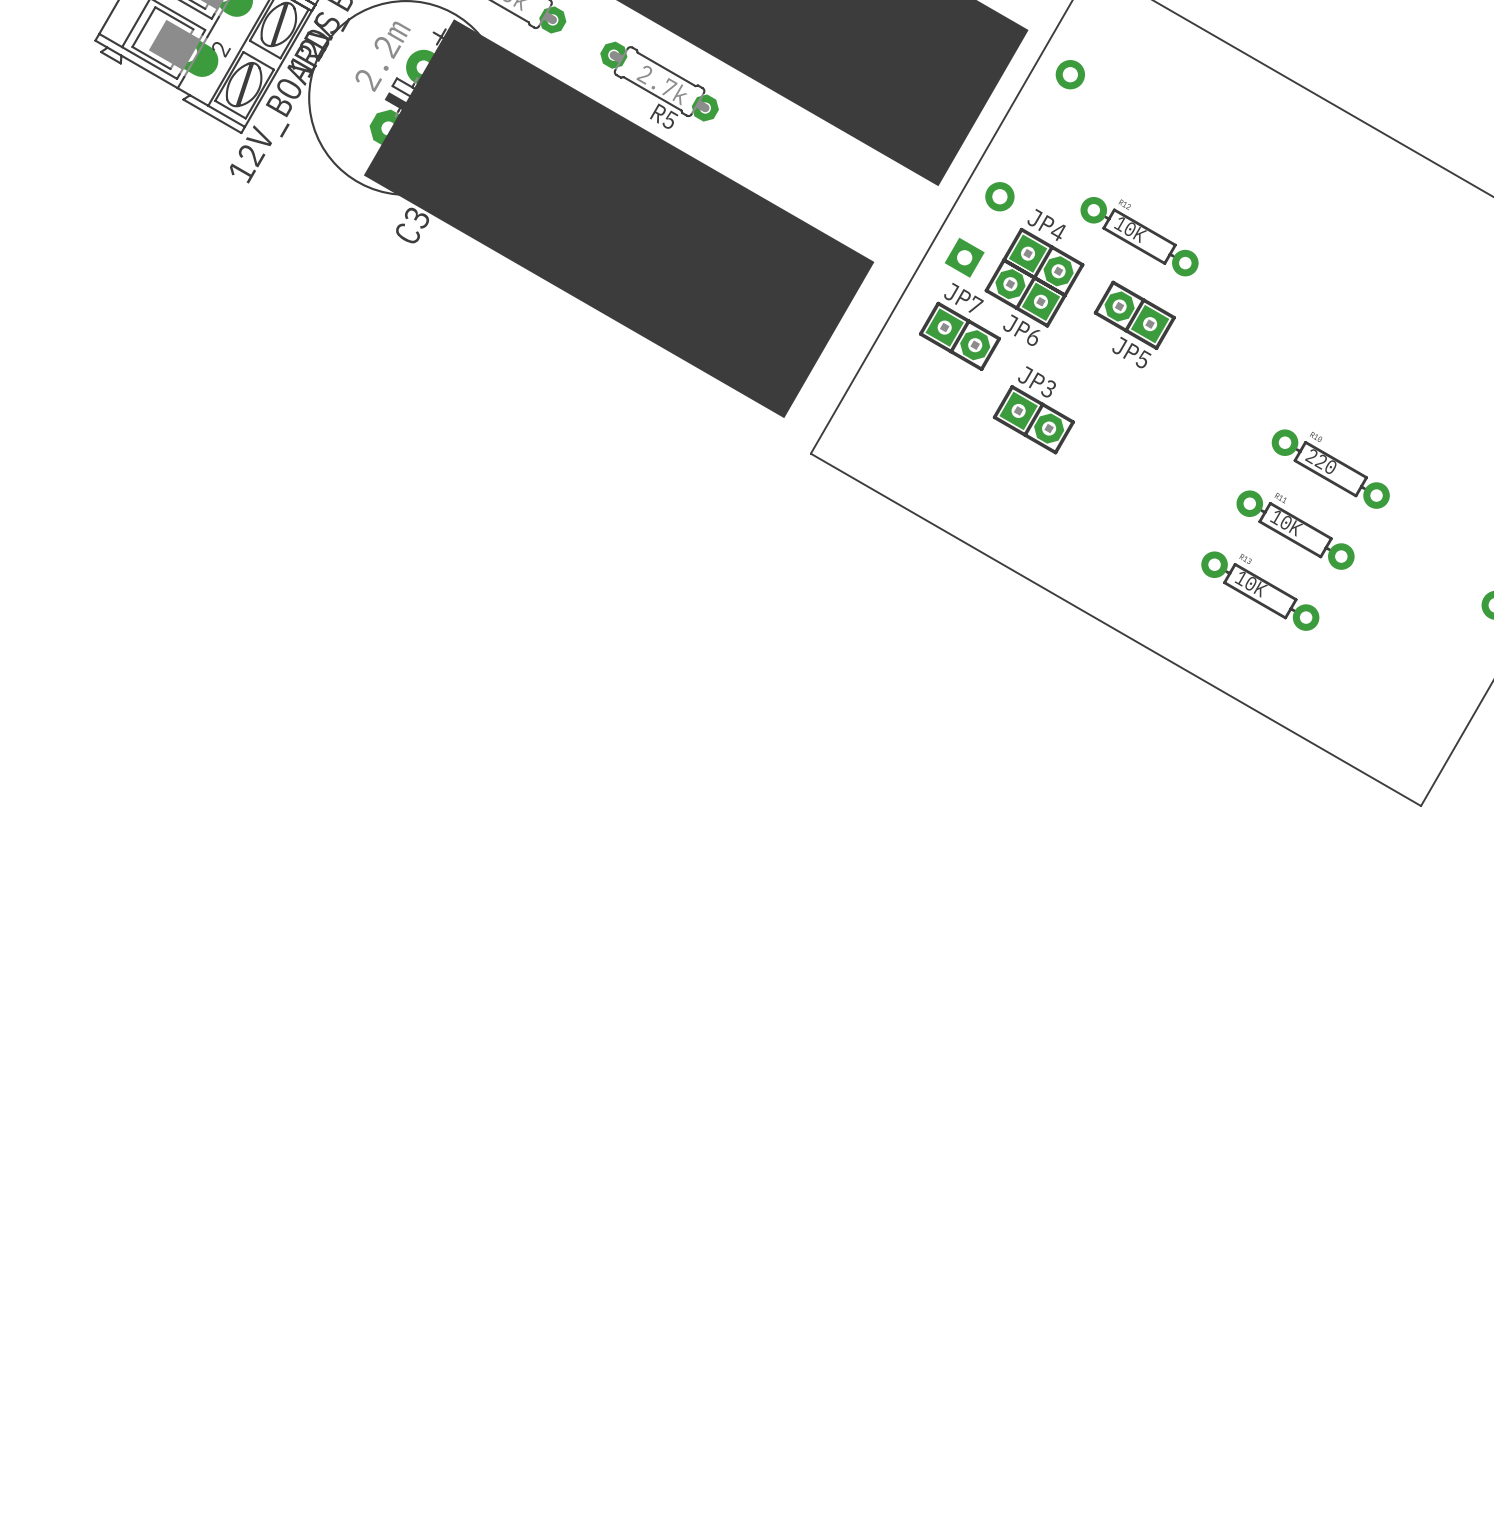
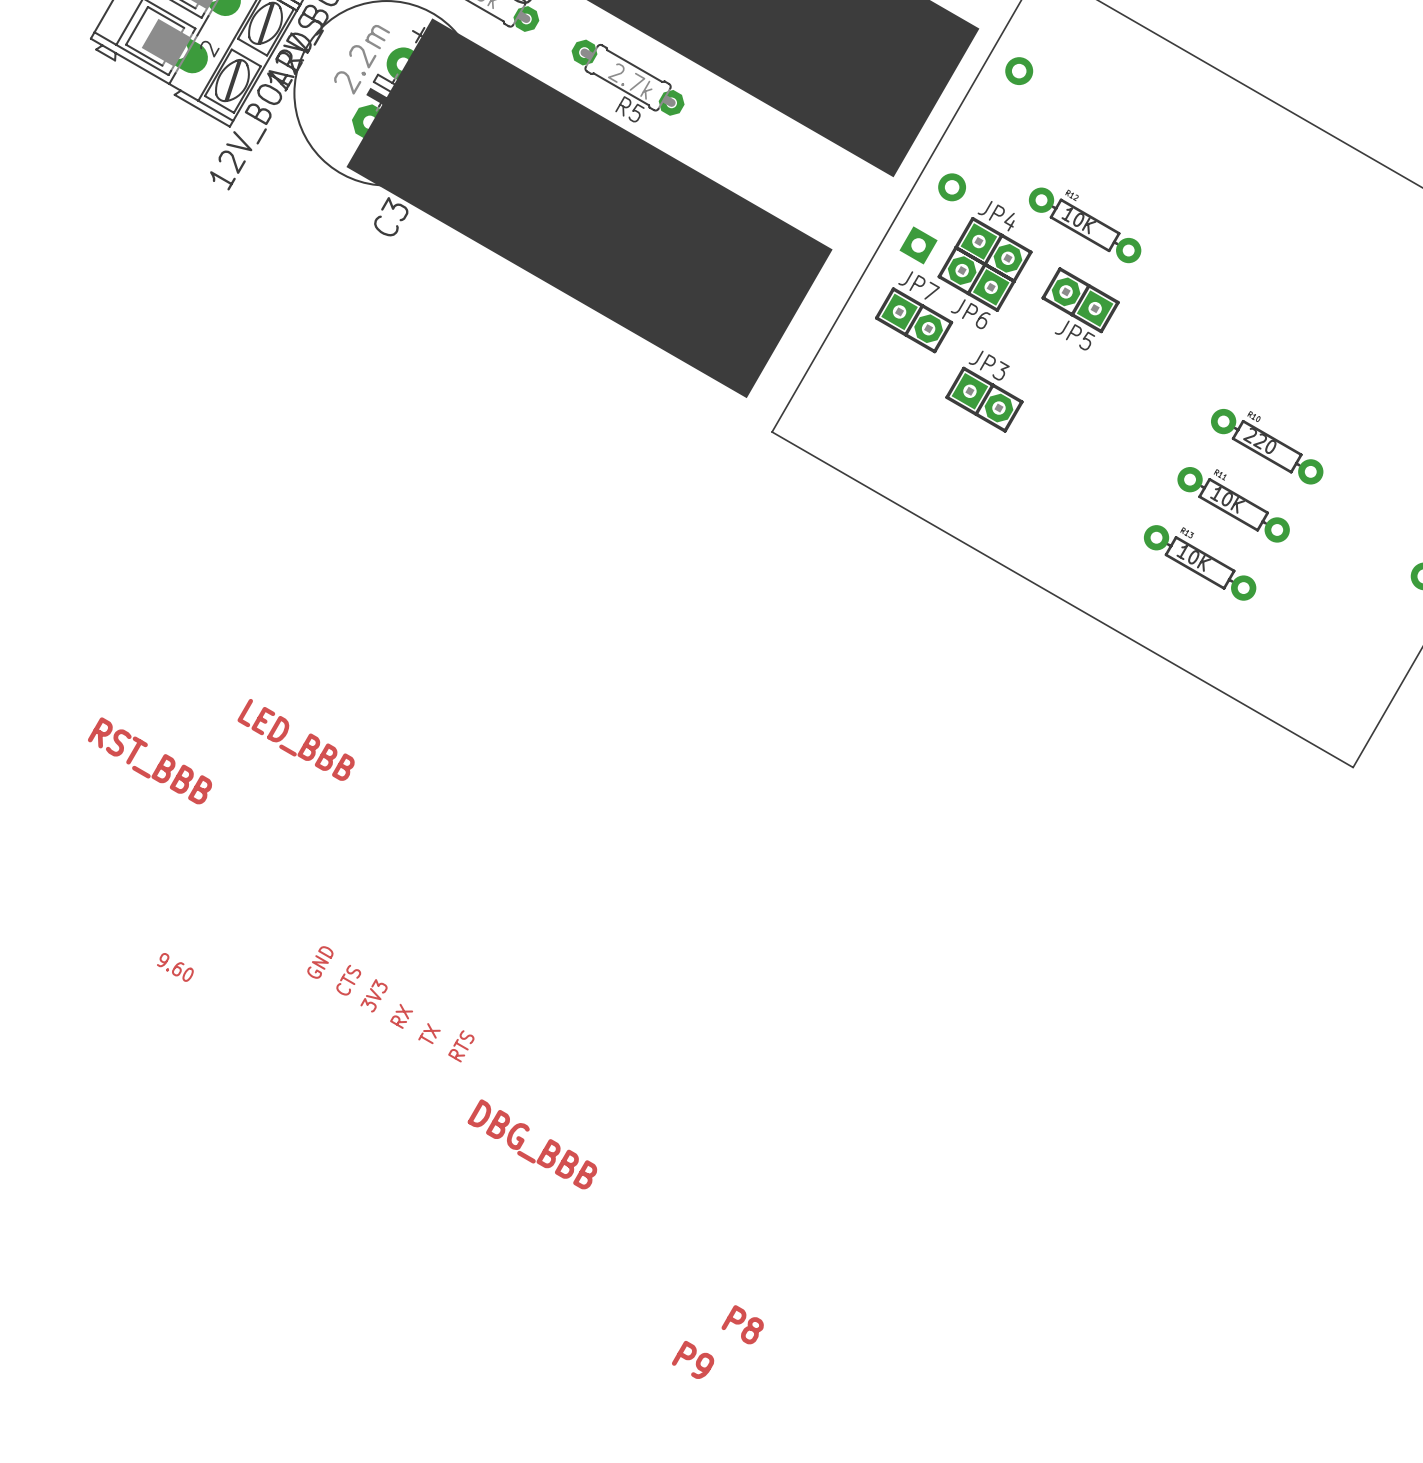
text: none -> LED_BBB (296, 739)
text: none -> RST_BBB (149, 760)
text: none -> GND (320, 962)
text: none -> 9.60 (175, 967)
text: none -> CTS (348, 980)
text: none -> 3V3 (374, 995)
text: none -> RX (401, 1016)
text: none -> TX (429, 1033)
text: none -> RTS (461, 1046)
text: none -> DBG_BBB (532, 1144)
text: none -> P8 (742, 1324)
text: none -> P9 (693, 1359)

